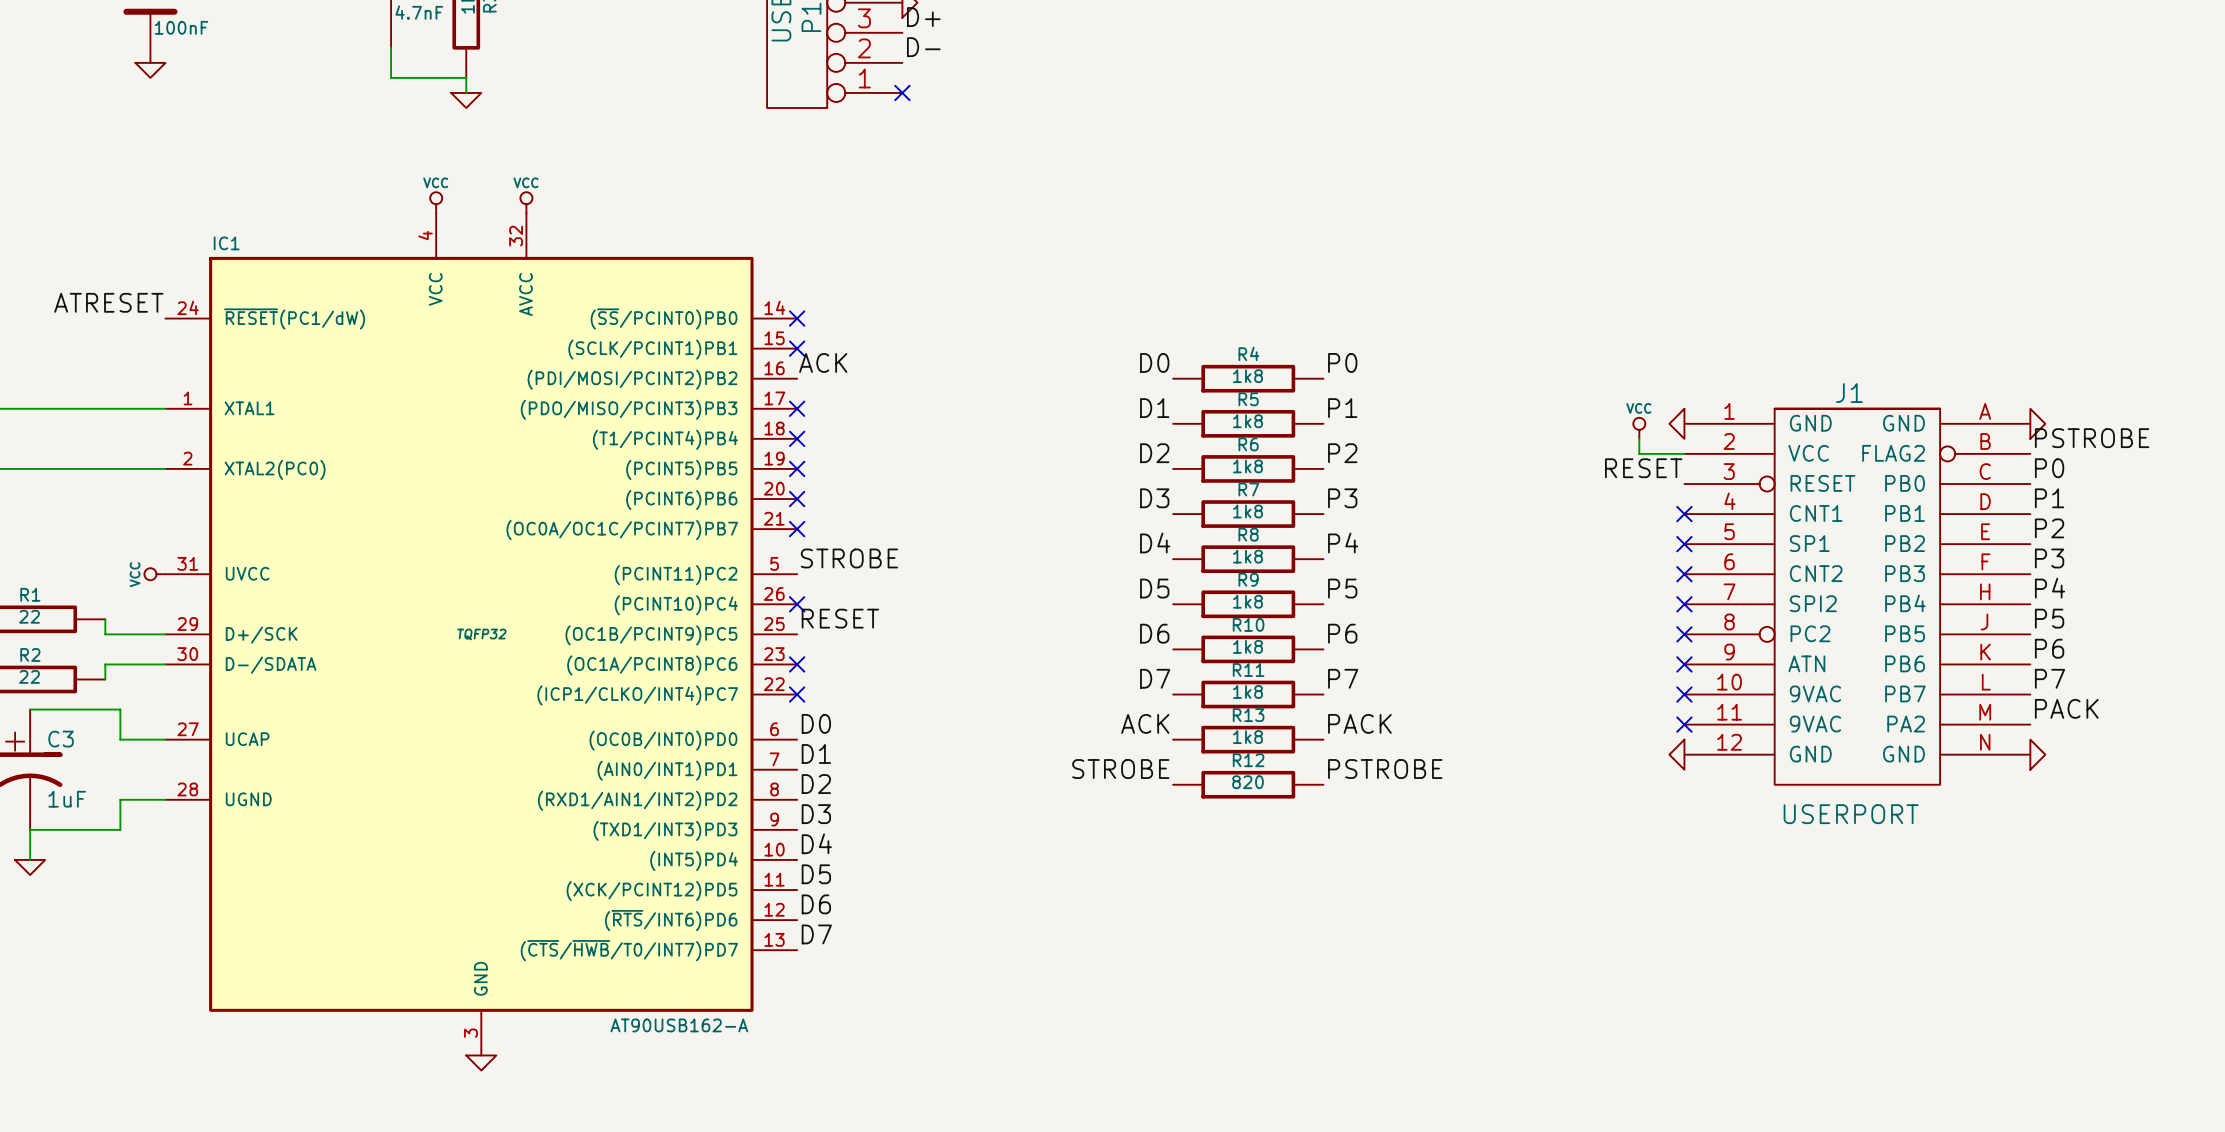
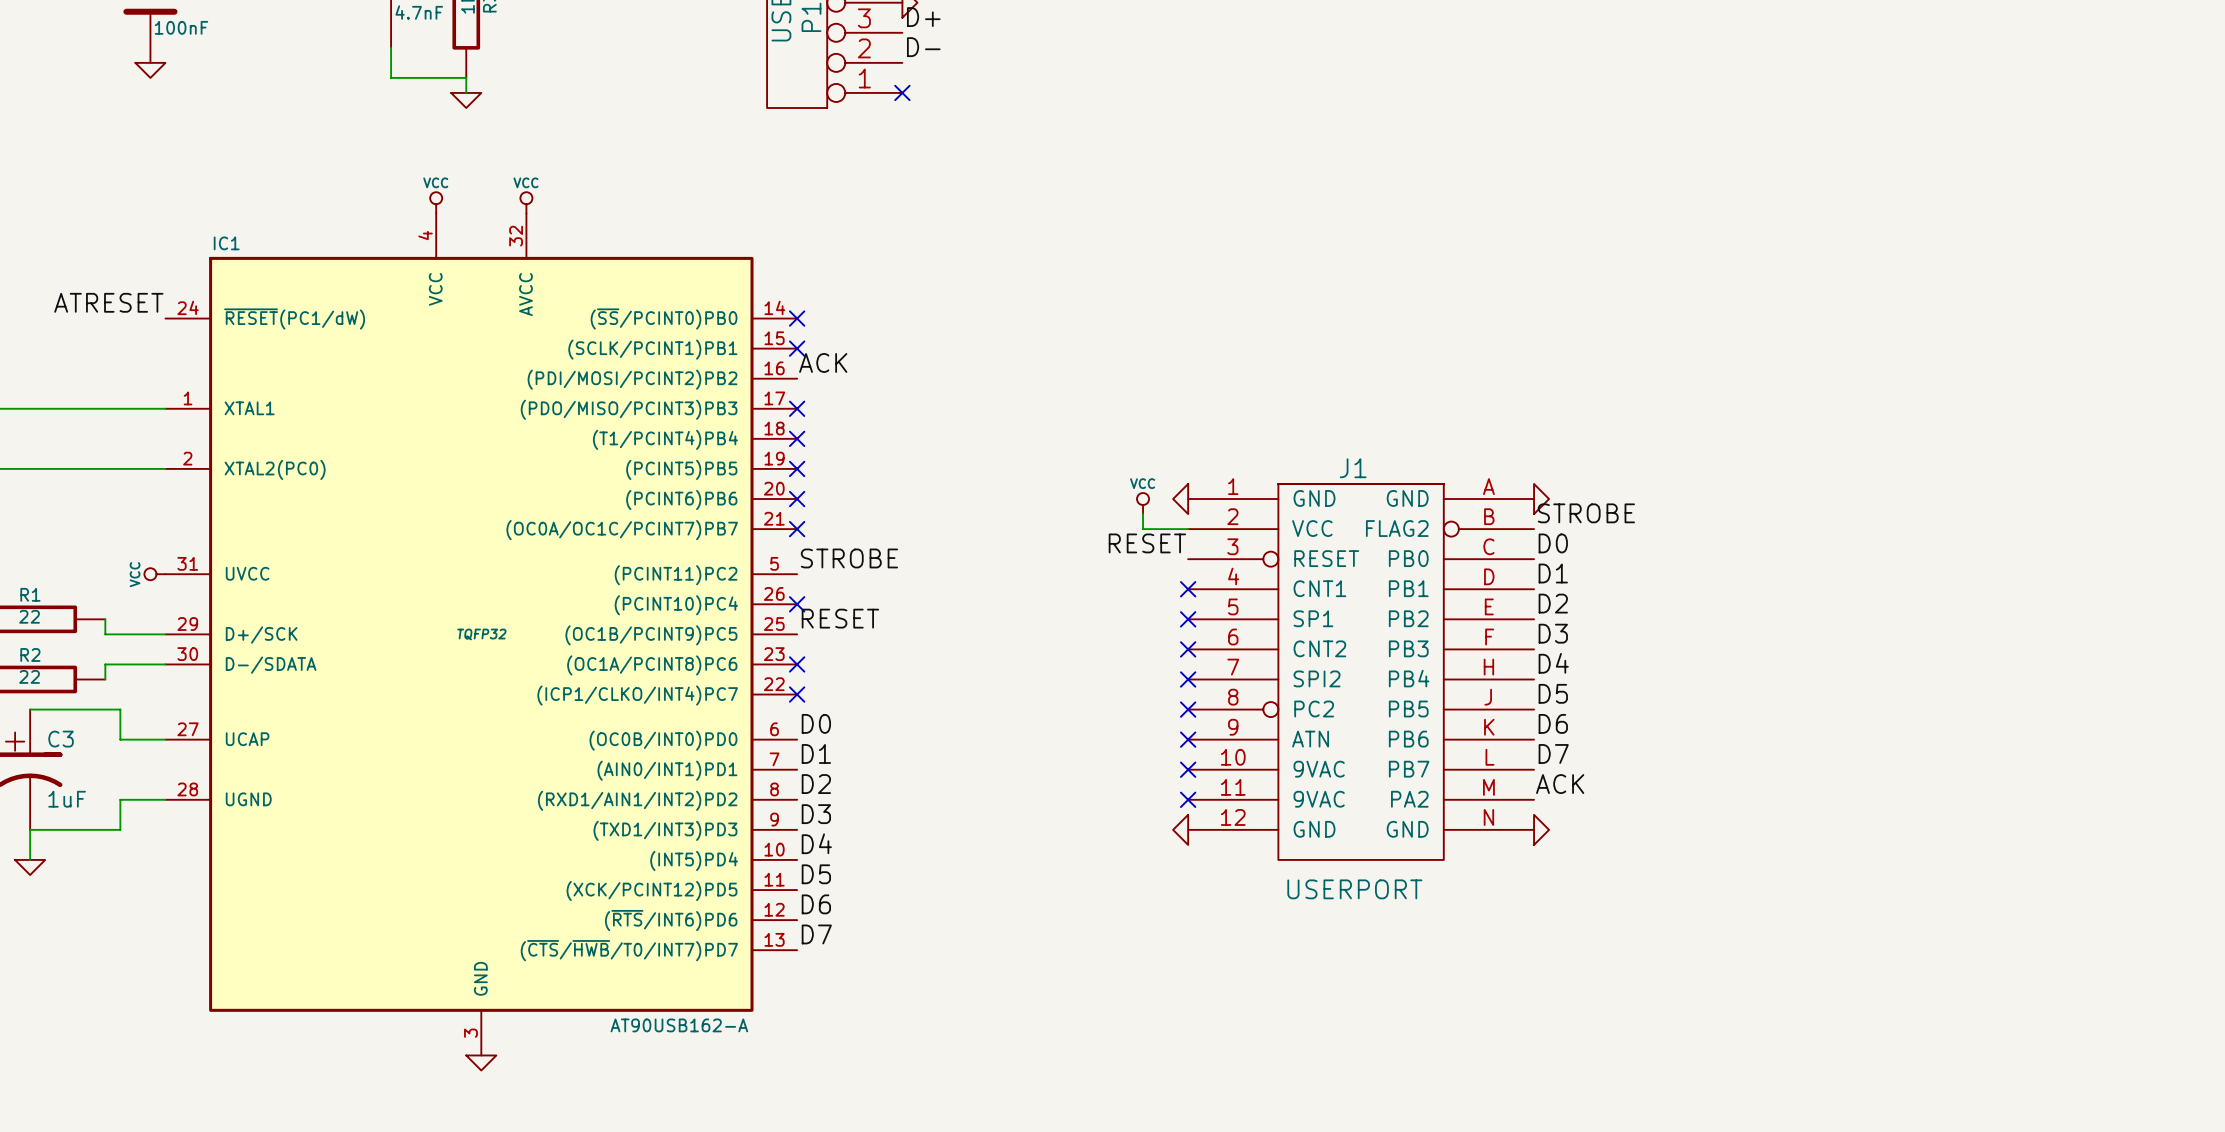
label: D0 (1154, 362) -> none
label: P0 (1342, 362) -> none
R4: 1k8 (1248, 378) -> none
label: D1 (1154, 408) -> none
label: P1 (1342, 408) -> none
R5: 1k8 (1248, 423) -> none
power symbol: (1676, 423) -> none
power symbol: (2037, 423) -> none
power symbol: VCC (1639, 428) -> none
wire: (1639, 438) (1639, 453) (1684, 453) -> none
label: PSTROBE (2092, 438) -> none
label: D2 (1154, 453) -> none
label: P2 (1342, 453) -> none
R6: 1k8 (1248, 468) -> none
label: RESET (1643, 468) -> none
label: P0 (2049, 468) -> none
label: D3 (1154, 498) -> none
label: P3 (1342, 498) -> none
label: P1 (2049, 498) -> none
power symbol: none -> (1180, 499)
power symbol: none -> (1541, 499)
power symbol: none -> VCC (1143, 503)
label: none -> STROBE (1586, 513)
wire: none -> (1143, 514) (1143, 529) (1188, 529)
R7: 1k8 (1248, 514) -> none
no-connect mark: (1684, 514) -> none
label: P2 (2049, 528) -> none
label: none -> RESET (1147, 543)
label: D4 (1155, 543) -> none
label: P4 (1343, 543) -> none
label: none -> D0 (1553, 543)
no-connect mark: (1684, 544) -> none
label: P3 (2049, 558) -> none
R8: 1k8 (1248, 559) -> none
label: none -> D1 (1553, 573)
no-connect mark: (1684, 574) -> none
label: D5 (1154, 588) -> none
label: P5 (1342, 588) -> none
label: P4 (2050, 588) -> none
no-connect mark: none -> (1188, 589)
J1 position: (1857, 596) -> (1361, 671)
label: none -> D2 (1553, 603)
R9: 1k8 (1248, 604) -> none
no-connect mark: (1684, 604) -> none
label: P5 (2049, 618) -> none
no-connect mark: none -> (1188, 619)
label: D6 (1154, 633) -> none
label: P6 (1342, 633) -> none
label: none -> D3 (1553, 633)
no-connect mark: (1684, 634) -> none
label: P6 (2049, 648) -> none
no-connect mark: none -> (1188, 649)
R10: 1k8 (1248, 649) -> none
label: none -> D4 (1553, 663)
no-connect mark: (1684, 664) -> none
label: D7 (1155, 678) -> none
label: P7 (1343, 678) -> none
label: P7 (2050, 678) -> none
no-connect mark: none -> (1188, 679)
label: none -> D5 (1553, 693)
R11: 1k8 (1248, 694) -> none
no-connect mark: (1684, 694) -> none
label: PACK (2066, 708) -> none
no-connect mark: none -> (1188, 709)
label: ACK (1145, 723) -> none
label: PACK (1359, 723) -> none
label: none -> D6 (1553, 723)
no-connect mark: (1684, 724) -> none
no-connect mark: none -> (1188, 739)
R13: 1k8 (1248, 739) -> none
label: none -> D7 (1553, 753)
power symbol: (1676, 754) -> none
power symbol: (2037, 754) -> none
label: STROBE (1120, 769) -> none
no-connect mark: none -> (1188, 769)
label: PSTROBE (1385, 769) -> none
R12: 820 (1248, 784) -> none
label: none -> ACK (1560, 784)
no-connect mark: none -> (1188, 799)
power symbol: none -> (1180, 829)
power symbol: none -> (1541, 829)

